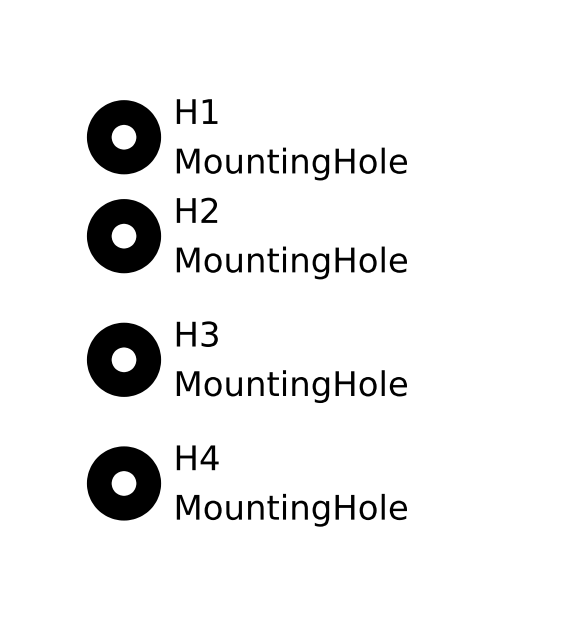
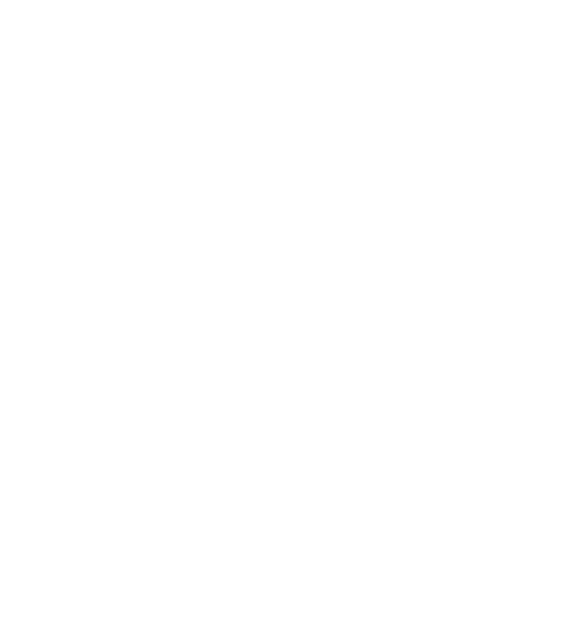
H1: MountingHole (124, 137) -> none
H2: MountingHole (124, 236) -> none
H3: MountingHole (124, 359) -> none
H4: MountingHole (124, 483) -> none

